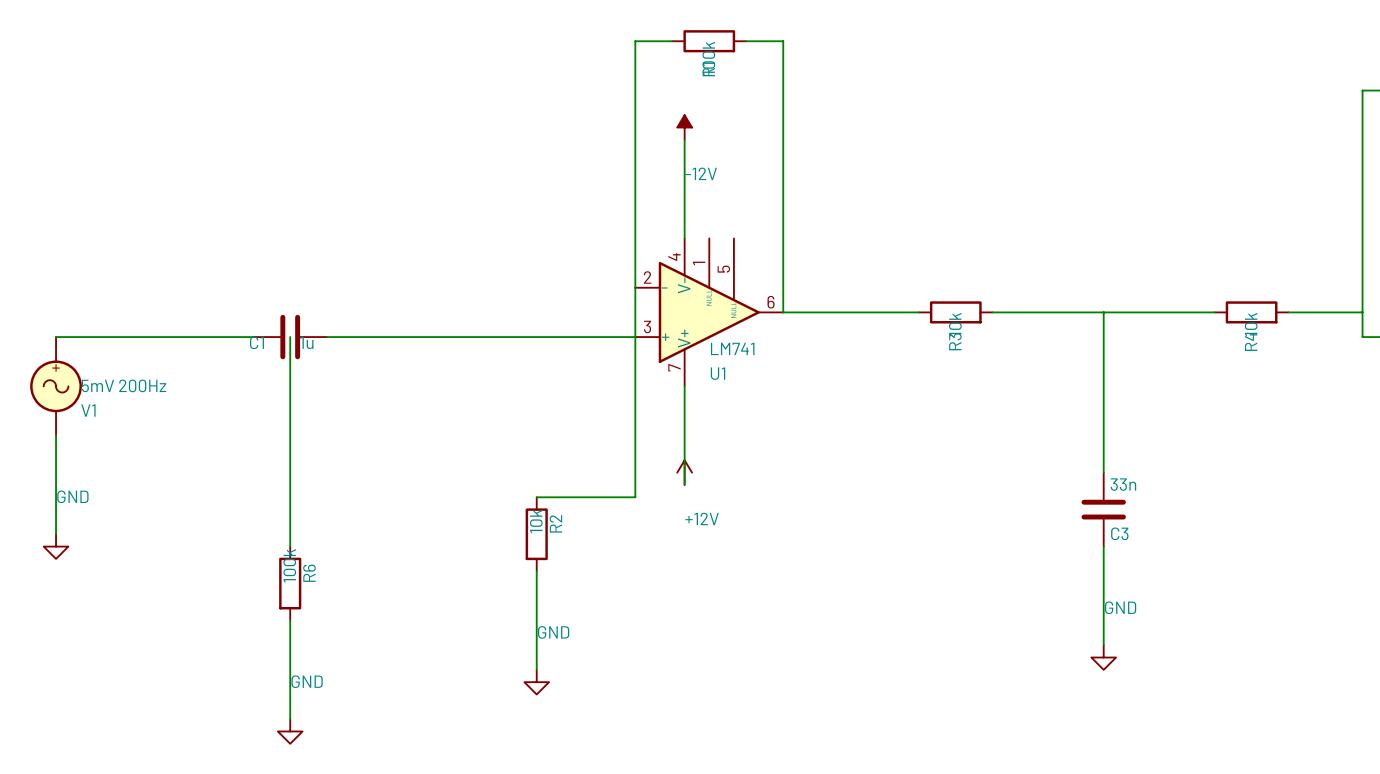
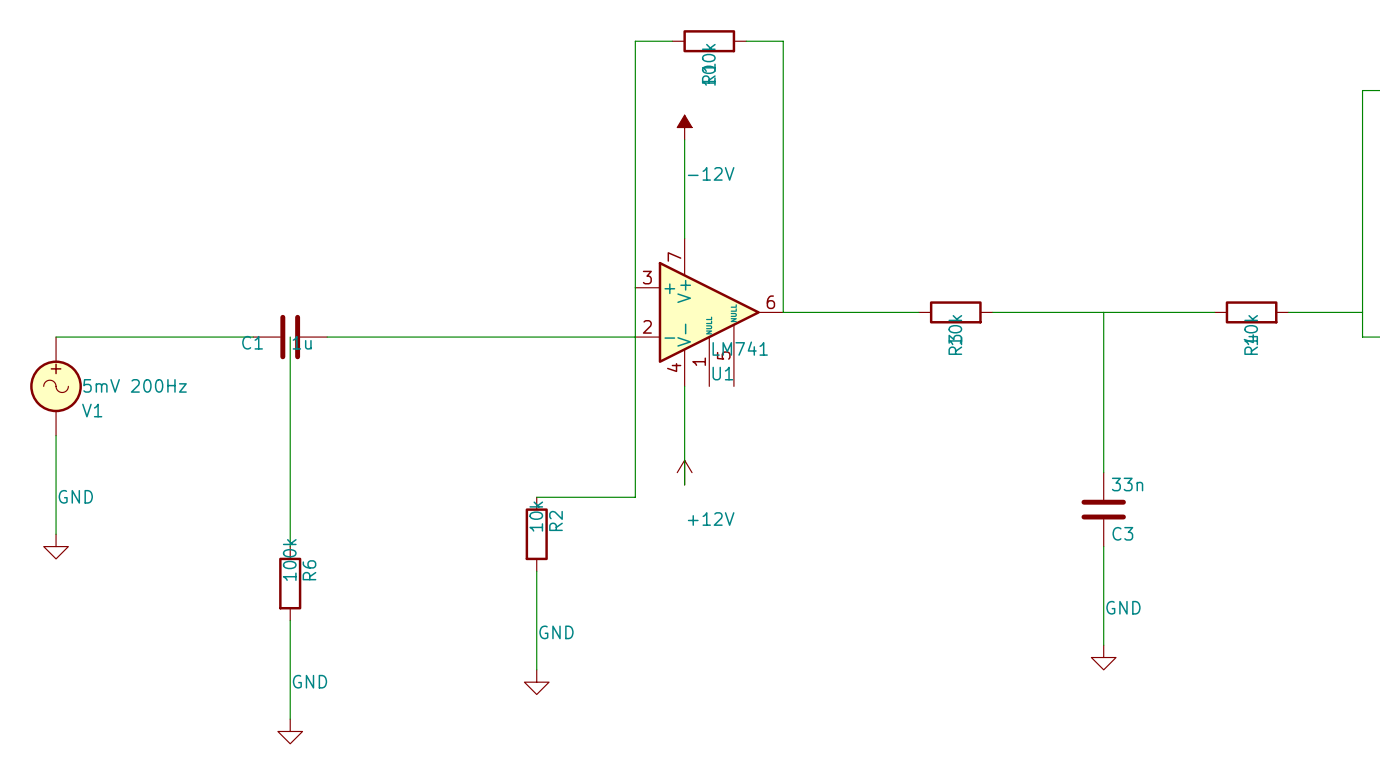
U1 flip: as is (709, 312) -> up-down (709, 312)

